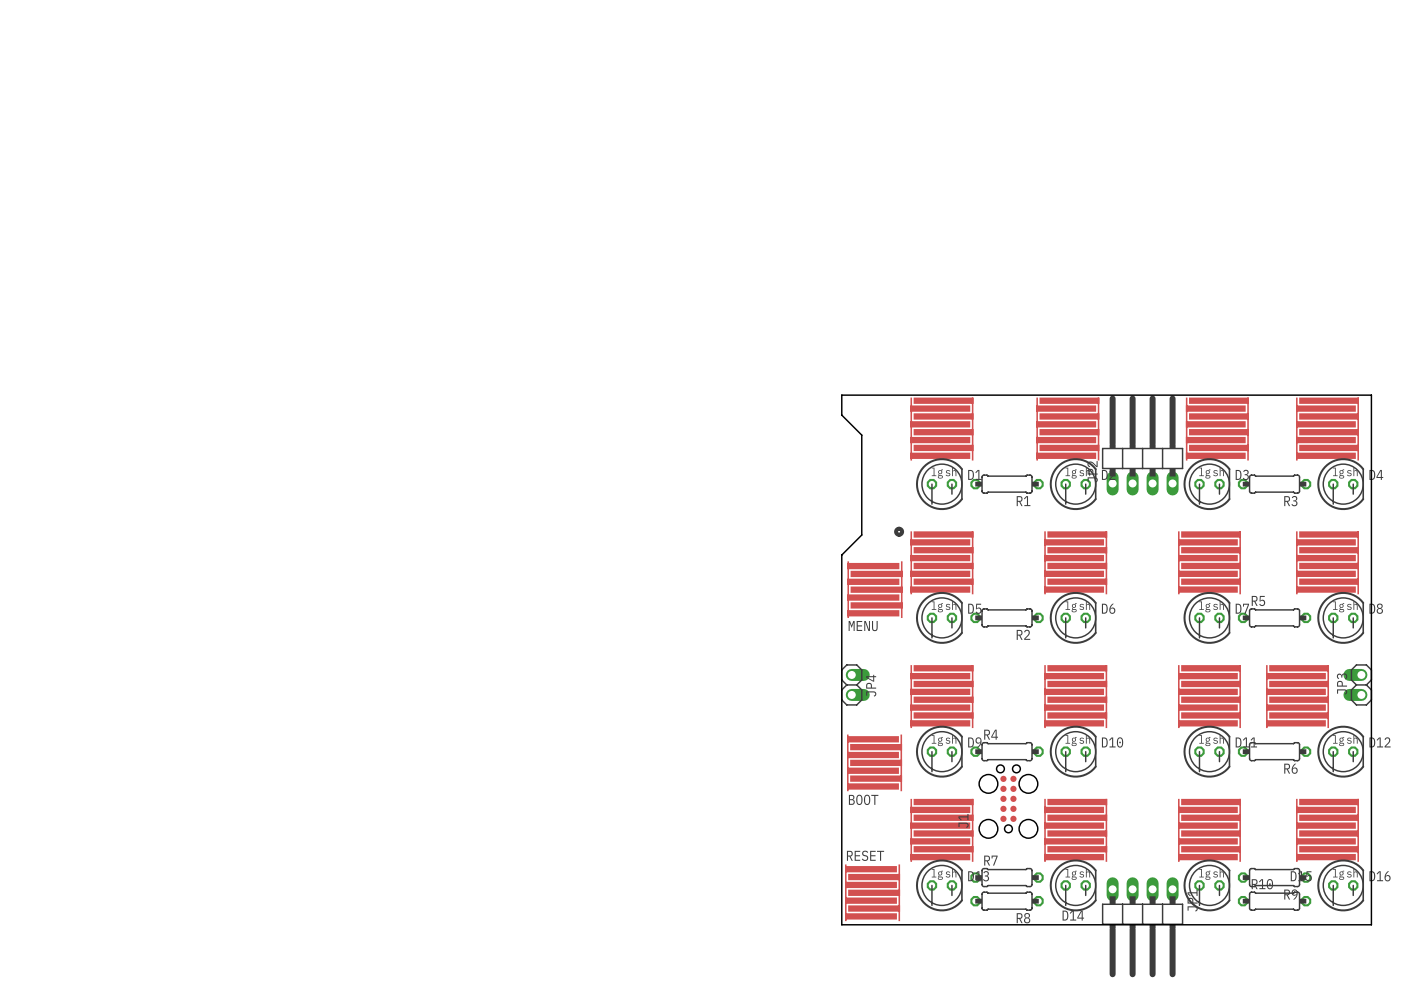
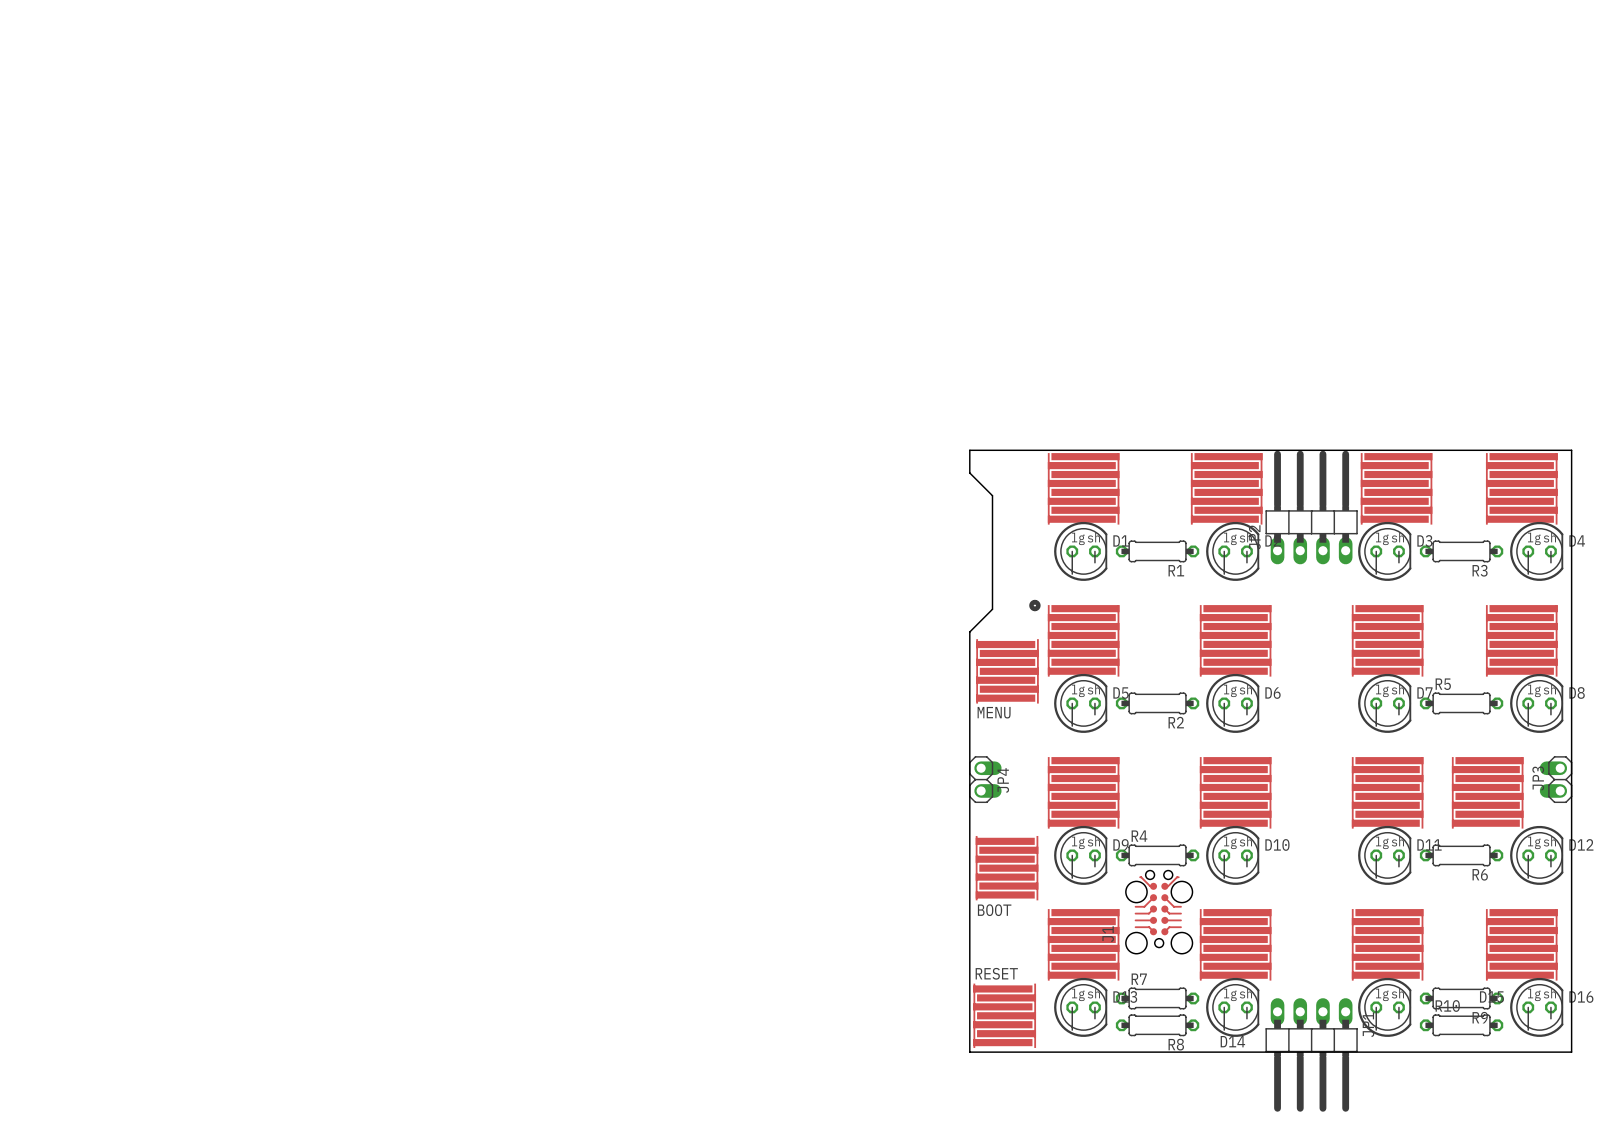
track: none -> (1140, 877) (1150, 886) (1153, 886)
track: none -> (1178, 877) (1168, 886) (1164, 886)
track: none -> (1153, 897) (1144, 906) (1135, 906)
track: none -> (1164, 897) (1173, 906) (1180, 906)
track: none -> (1153, 909) (1148, 913) (1135, 913)
track: none -> (1164, 909) (1169, 913) (1180, 913)
track: none -> (1135, 920) (1153, 920)
track: none -> (1164, 920) (1180, 920)
track: none -> (1135, 927) (1149, 927) (1153, 931)
track: none -> (1180, 927) (1169, 927) (1164, 931)

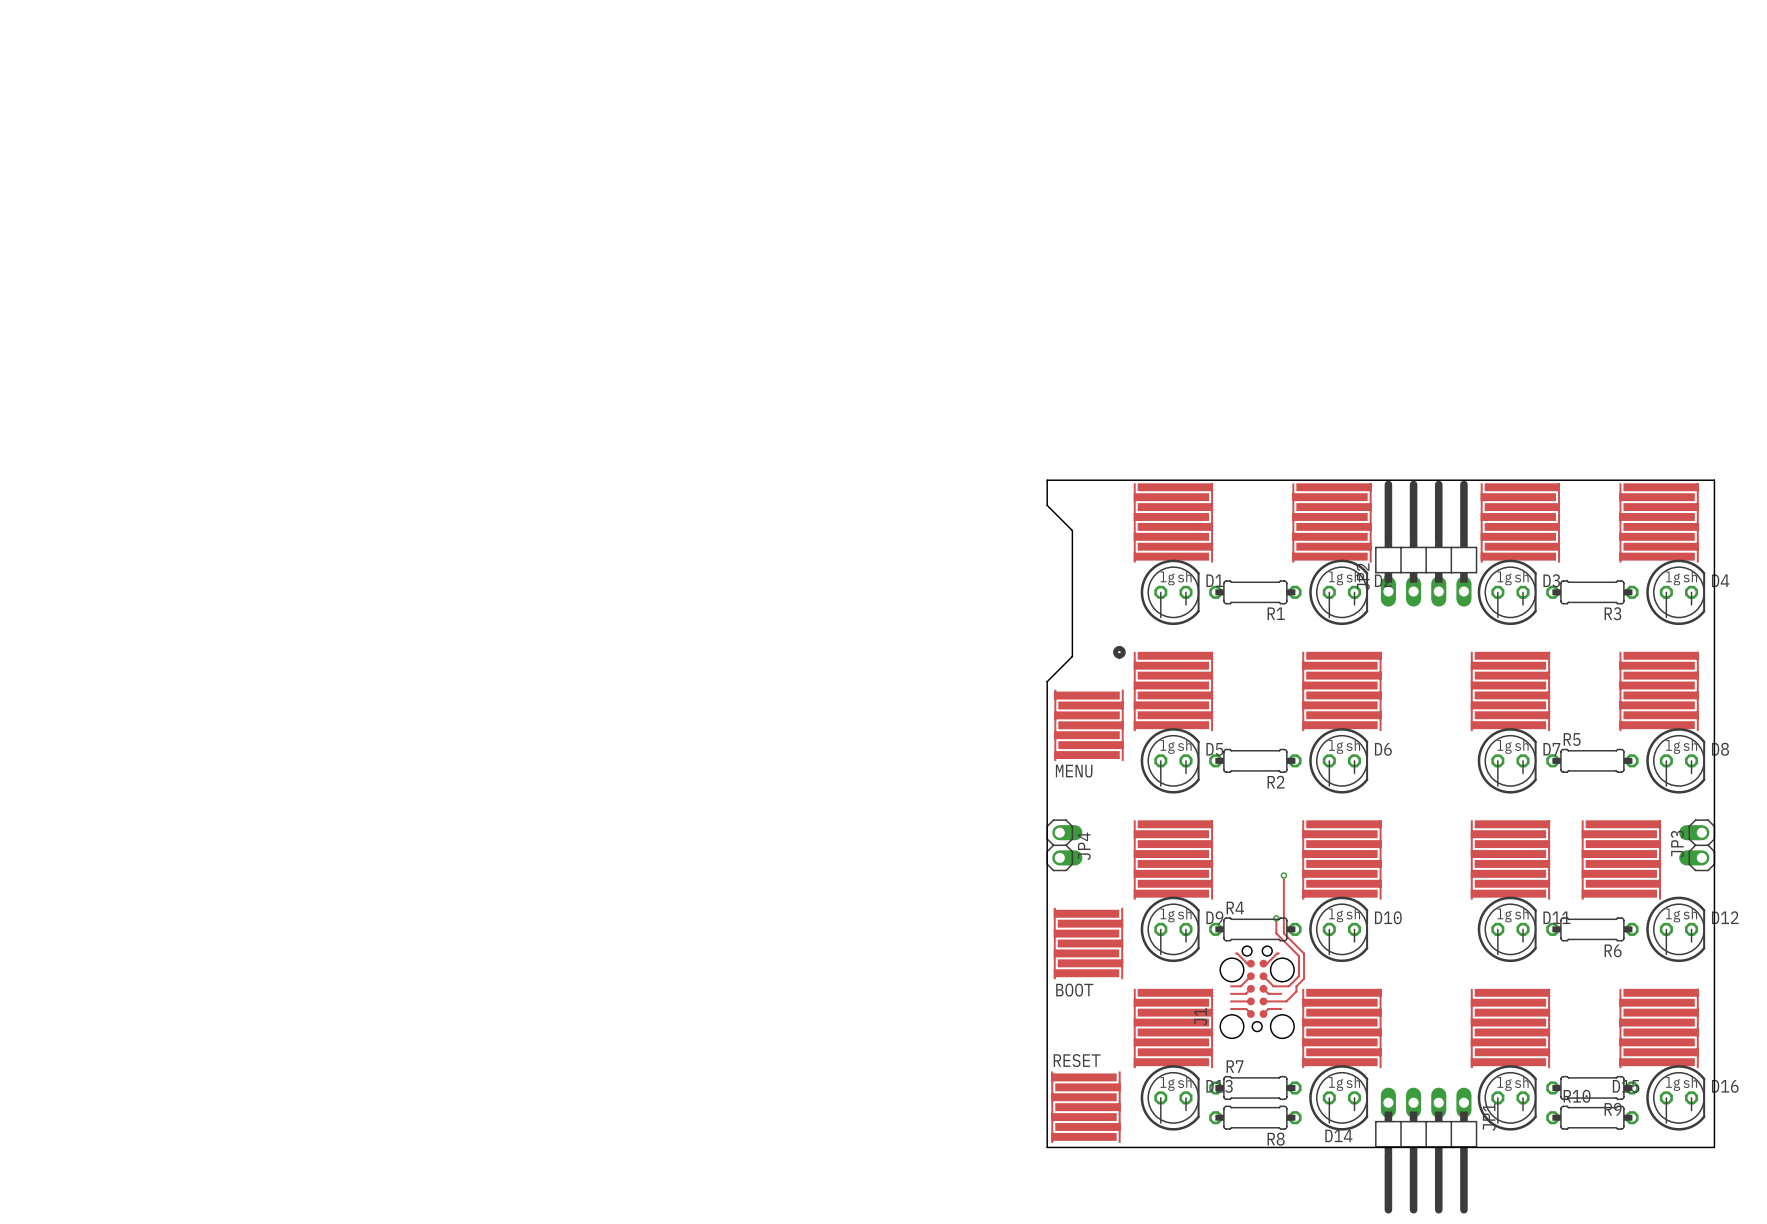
track: none -> (1283, 875) (1283, 933) (1304, 953) (1304, 978) (1296, 986) (1296, 991) (1286, 1001) (1281, 1001)
via: none -> (1283, 875)
track: none -> (1276, 918) (1276, 933) (1298, 956) (1298, 976) (1288, 986) (1281, 986)
via: none -> (1276, 918)

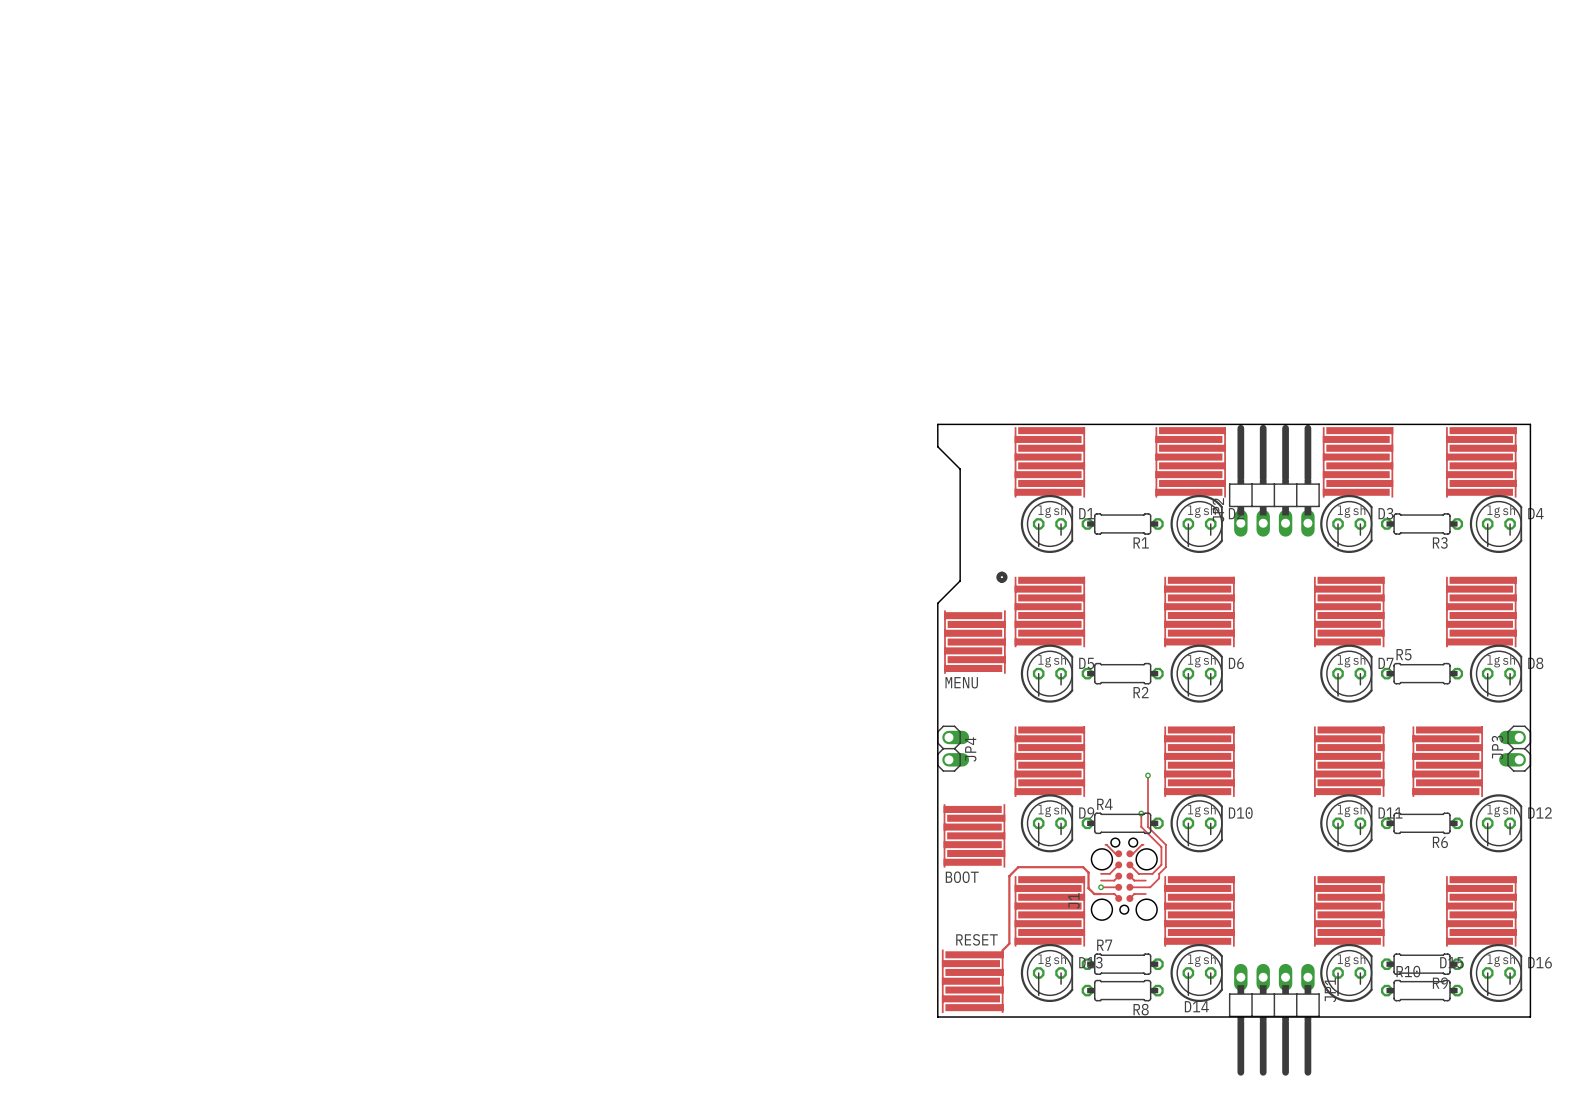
via: none -> (1101, 887)
track: none -> (1101, 894) (1094, 894) (1088, 888) (1088, 872) (1083, 867) (1018, 867) (1009, 876) (1009, 943) (1002, 950)
part rotation: 0° (1085, 1107) -> 180° (972, 981)

